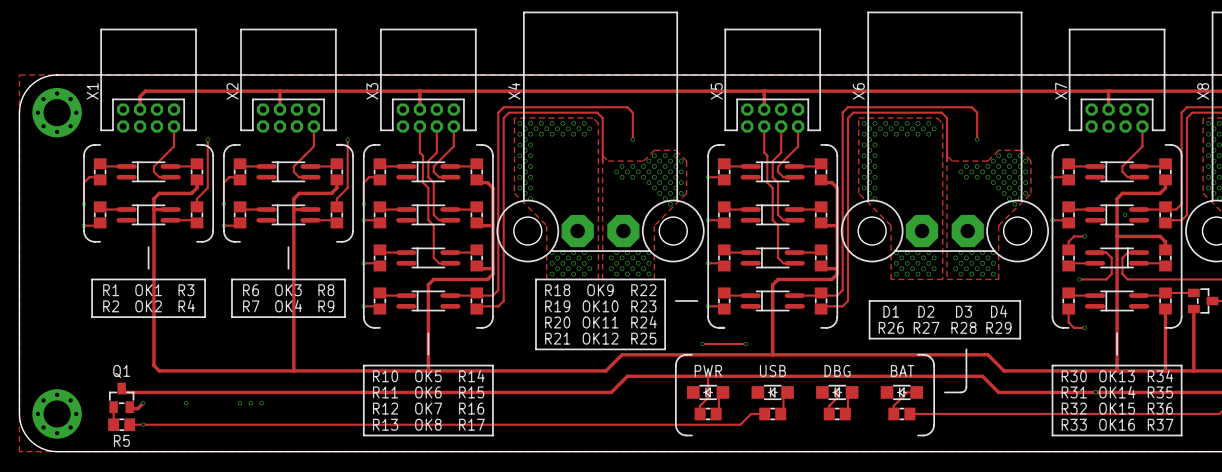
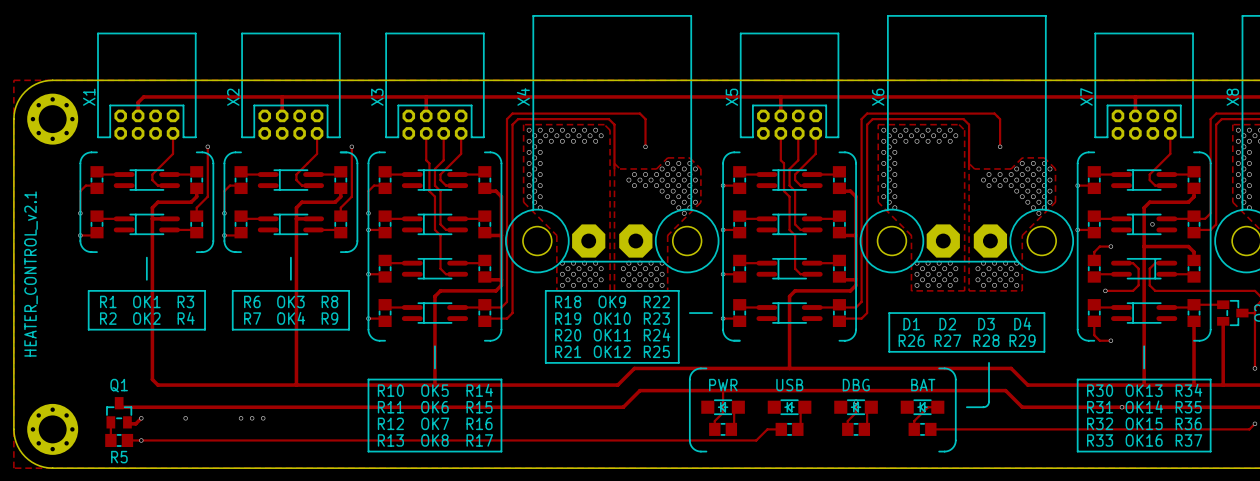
text: none -> HEATER_CONTROL_v2.1 (31, 274)
track: (702, 344) (745, 344) -> none
via: (702, 344) -> none
via: (745, 344) -> none

